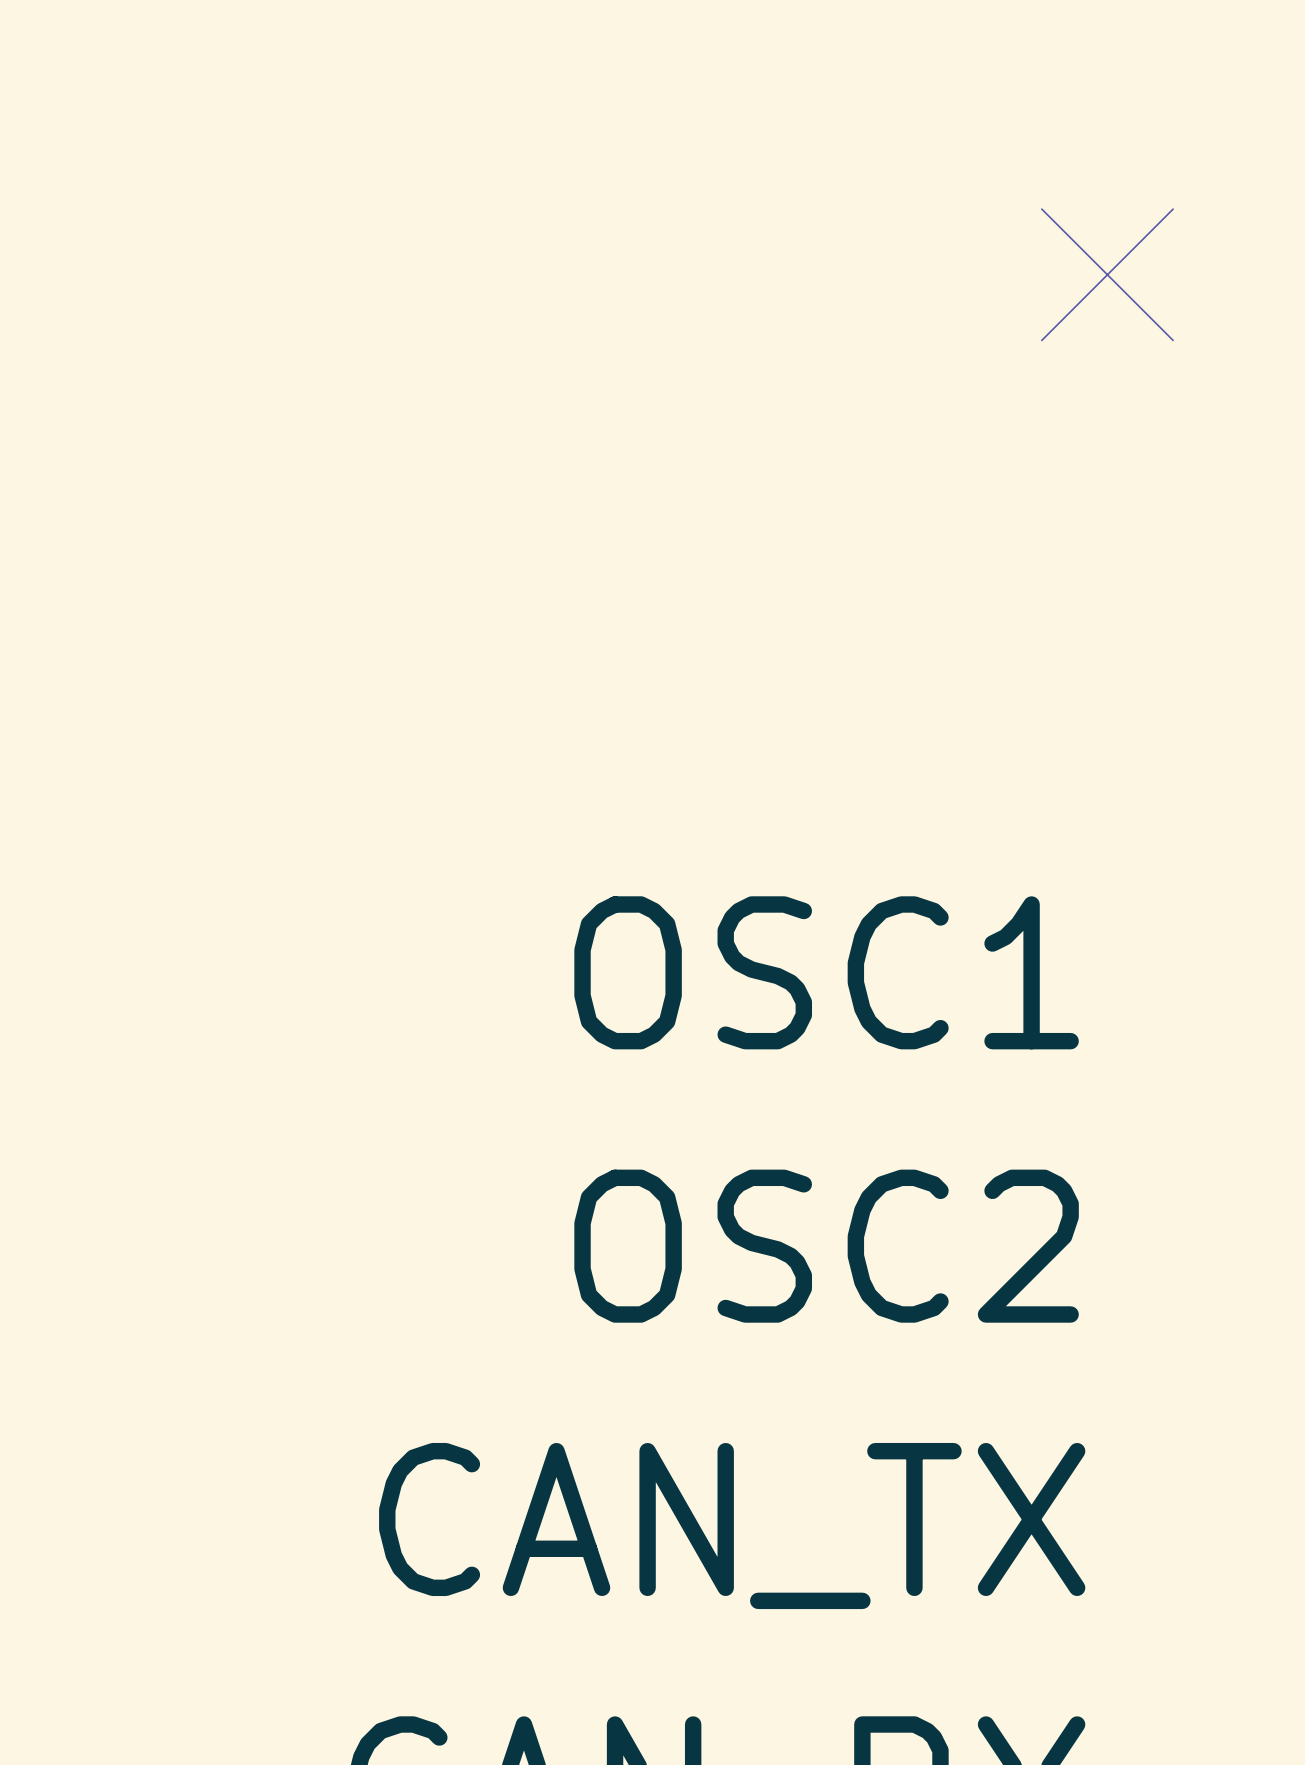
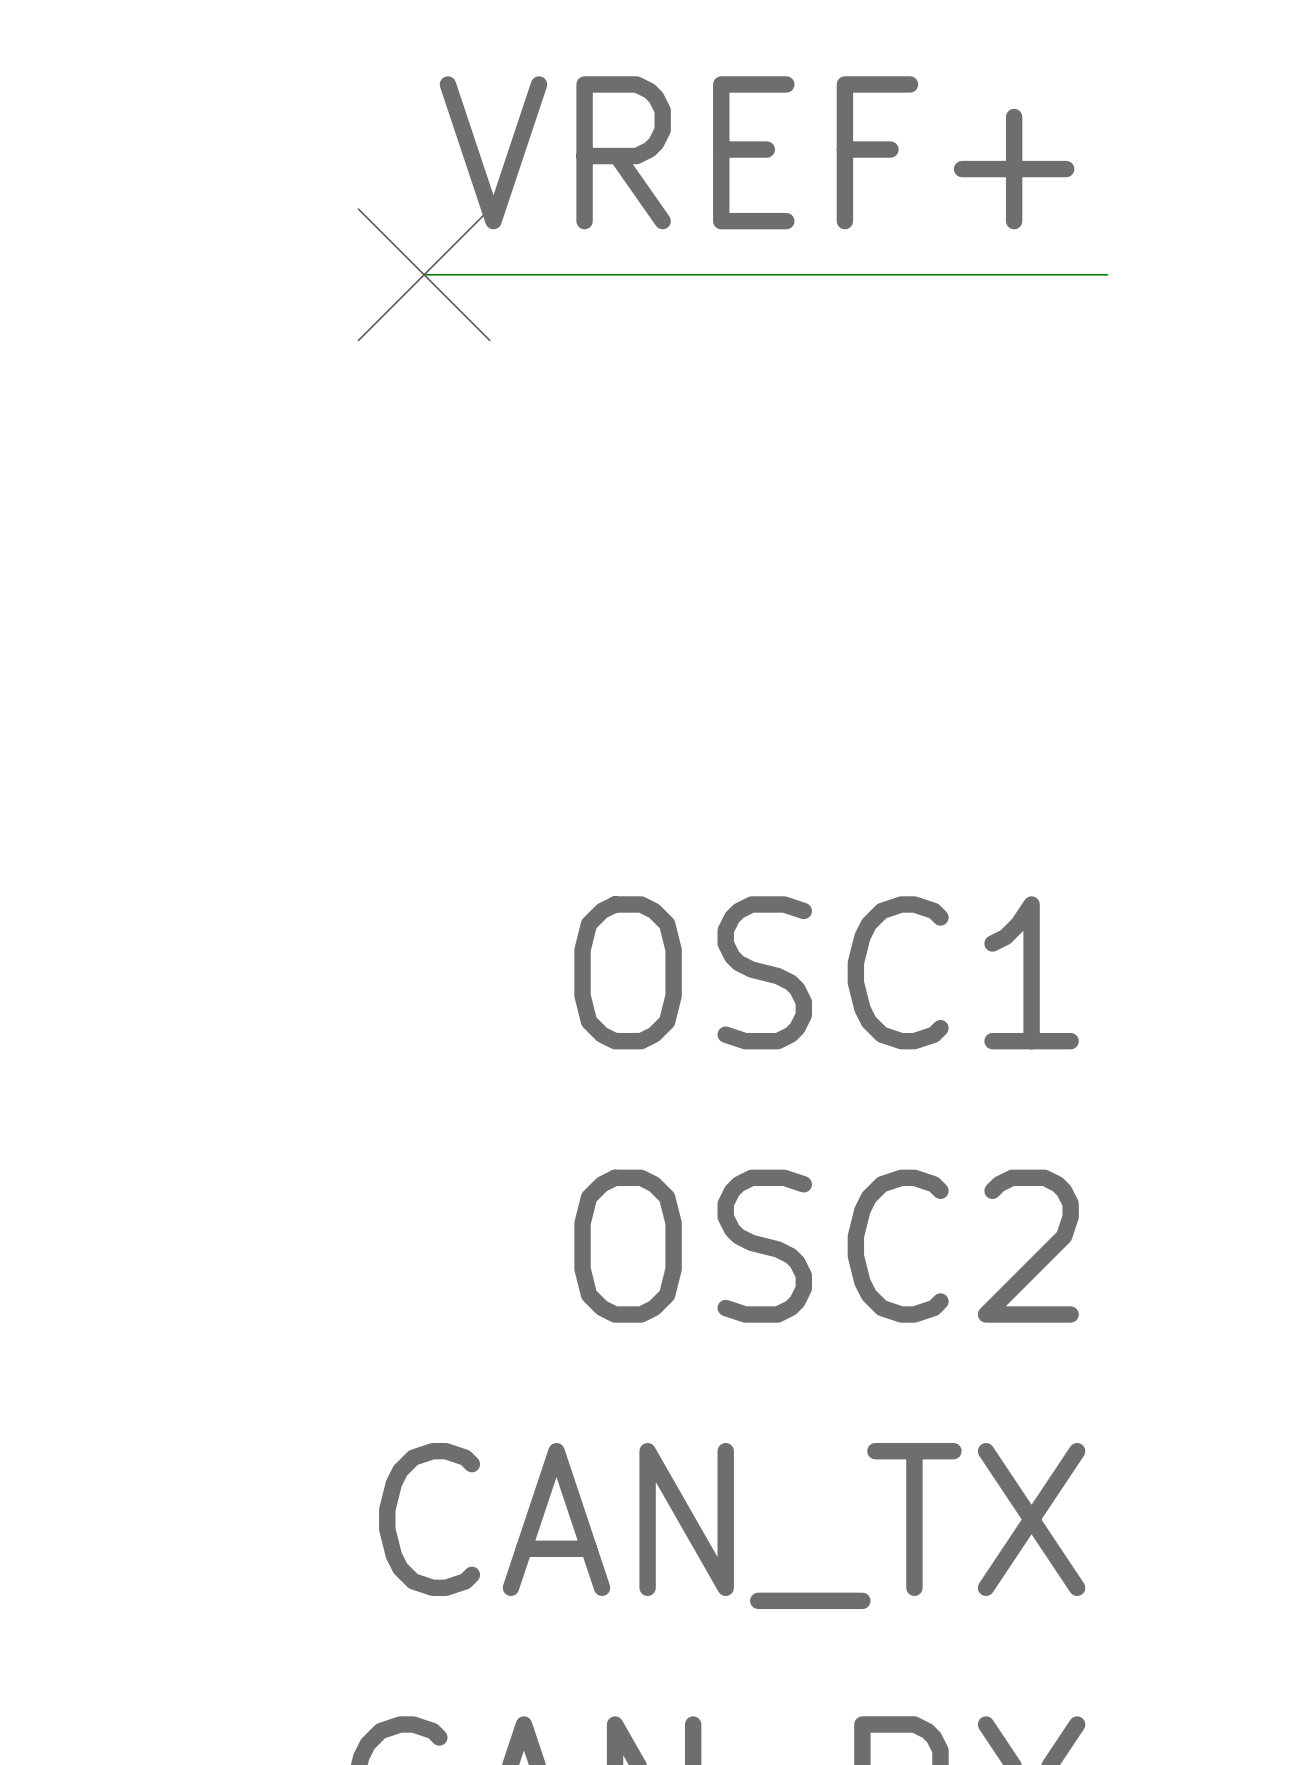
label: none -> VREF+ (757, 152)
wire: none -> (424, 274) (1107, 274)
no-connect mark: none -> (424, 274)
no-connect mark: (1107, 274) -> none

